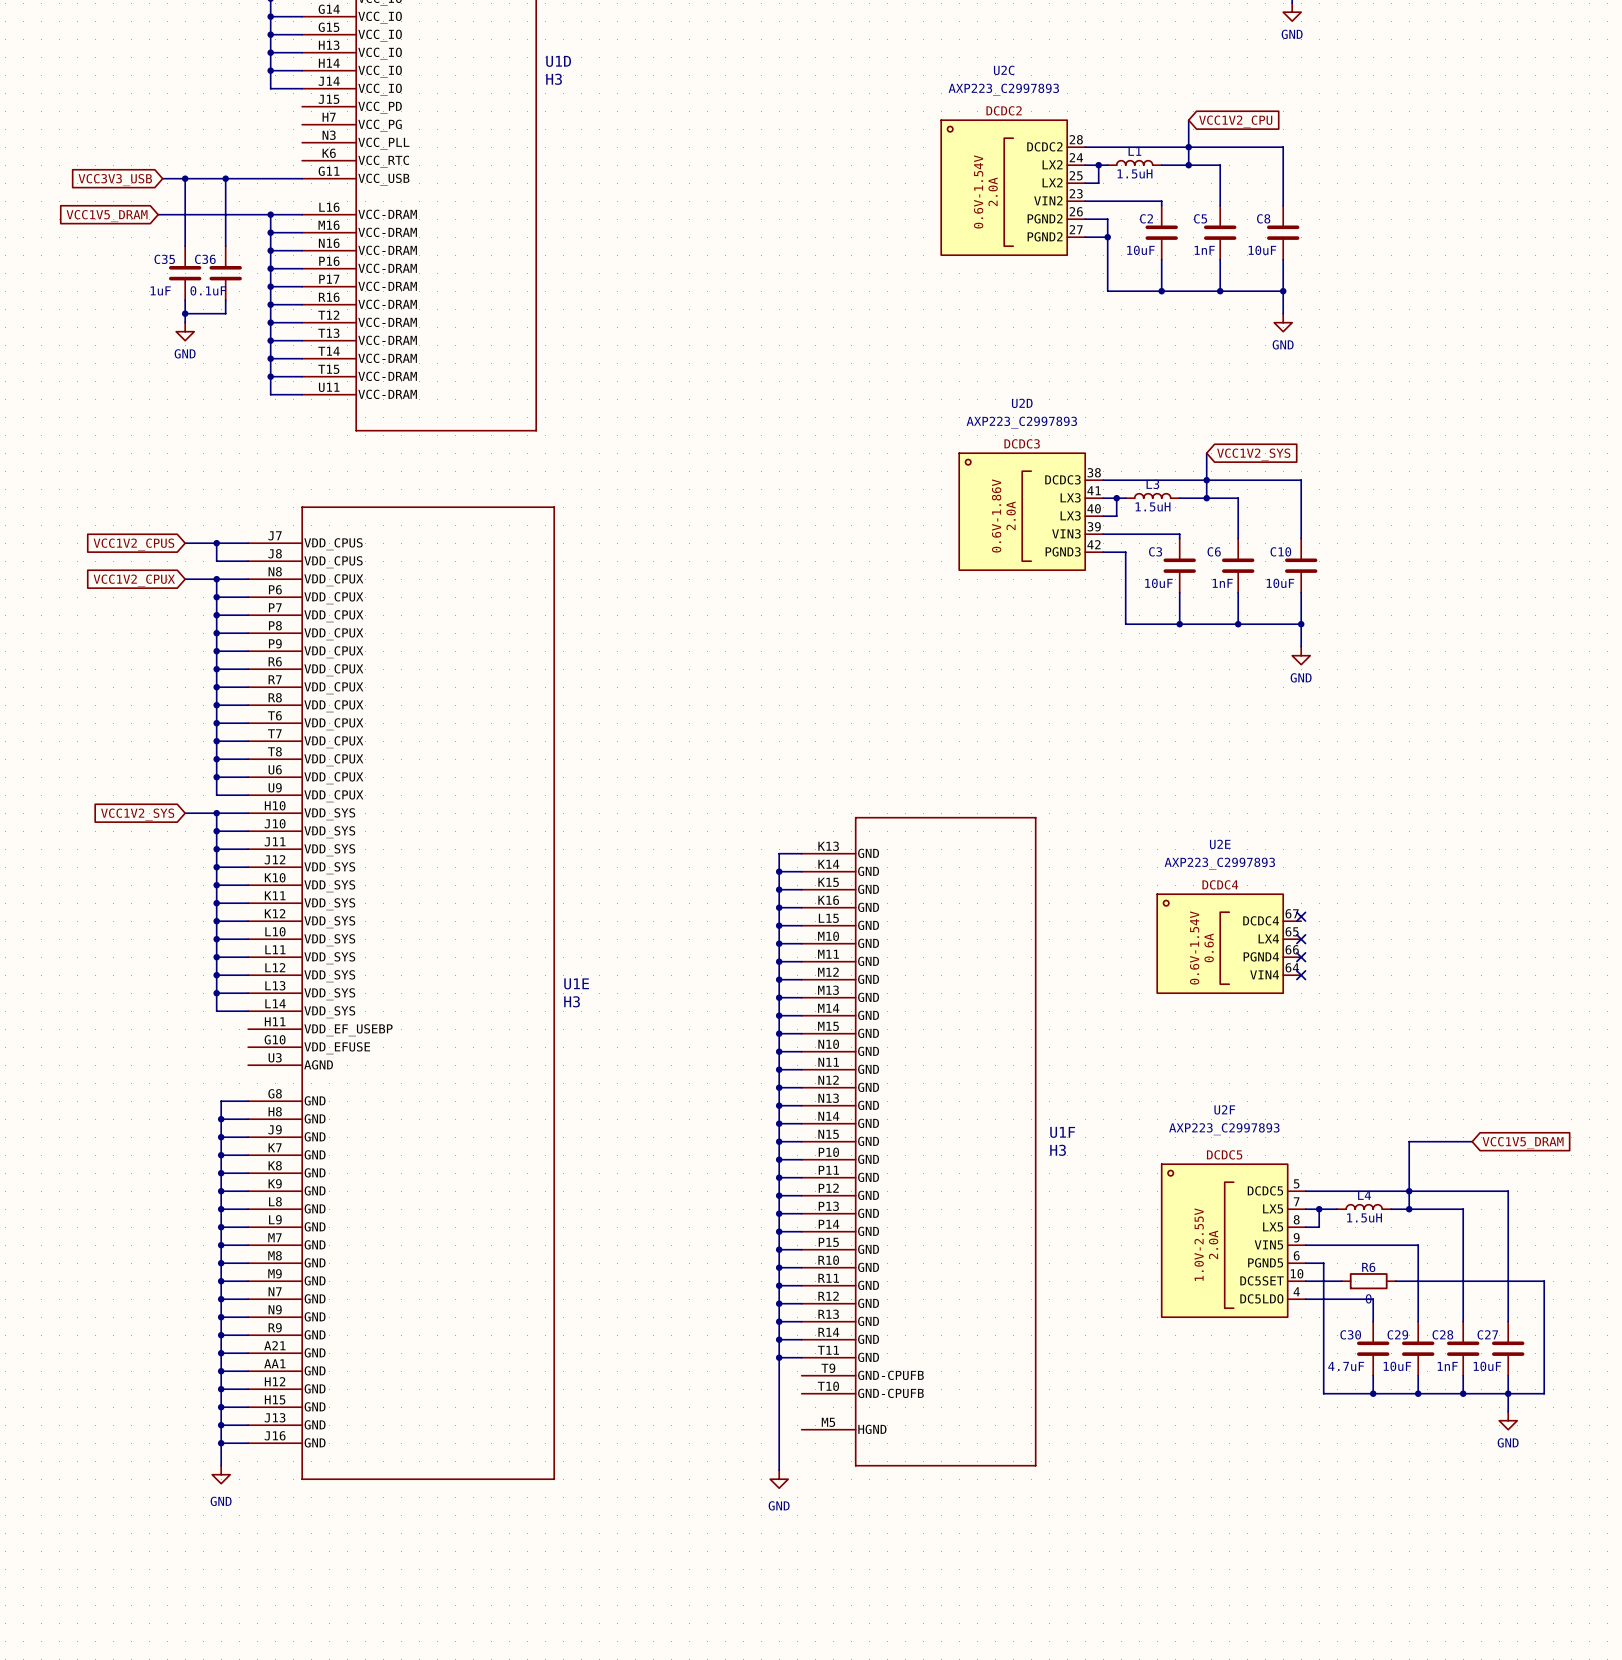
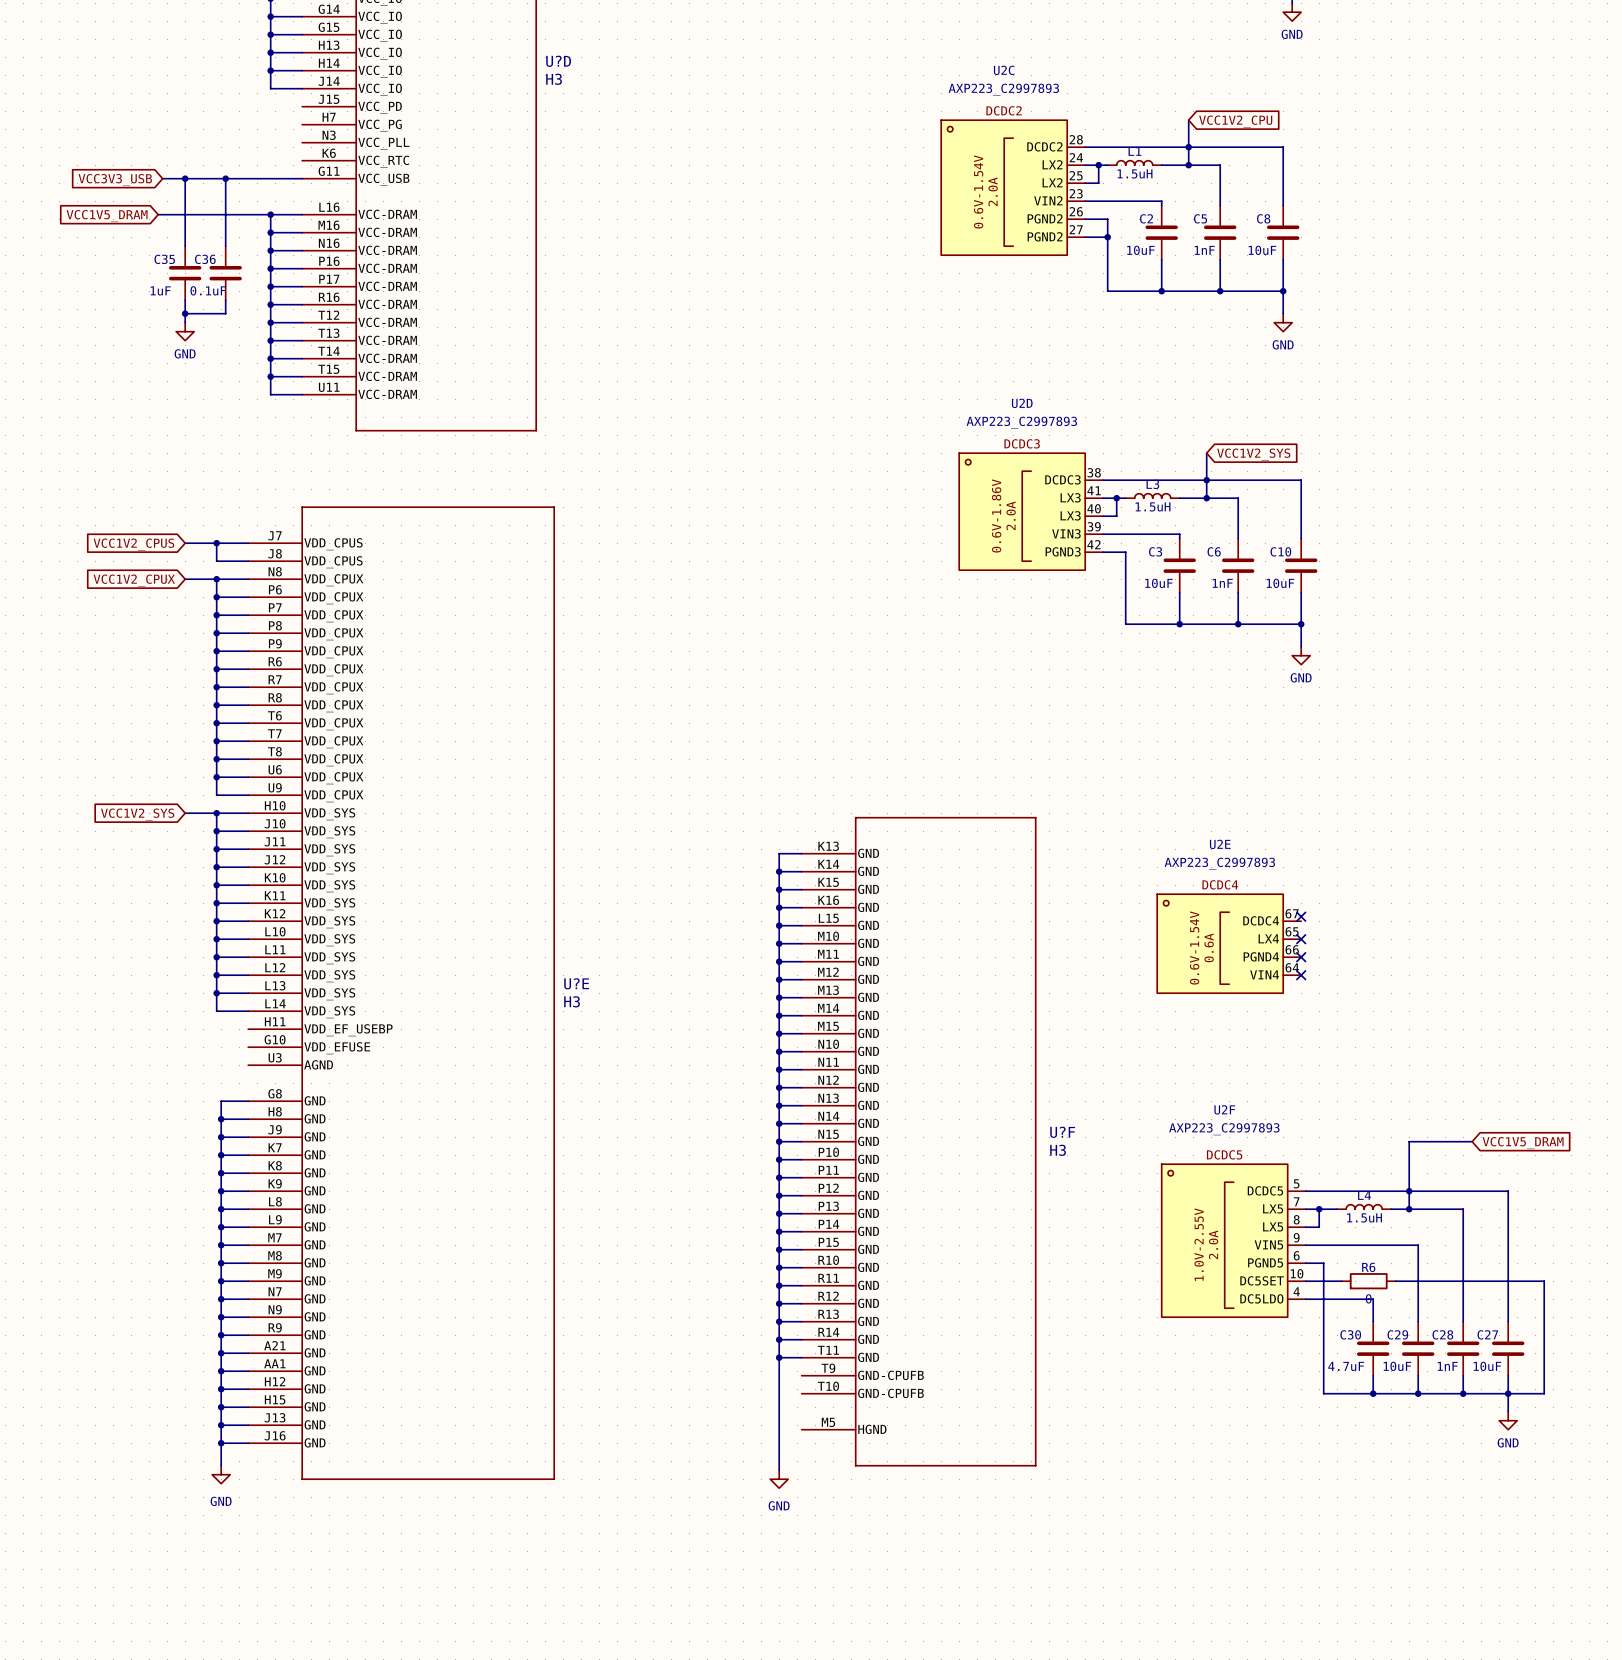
U1D name: U1D (558, 61) -> U?D (558, 61)
U1E name: U1E (576, 983) -> U?E (576, 983)
U1F name: U1F (1062, 1132) -> U?F (1062, 1132)

